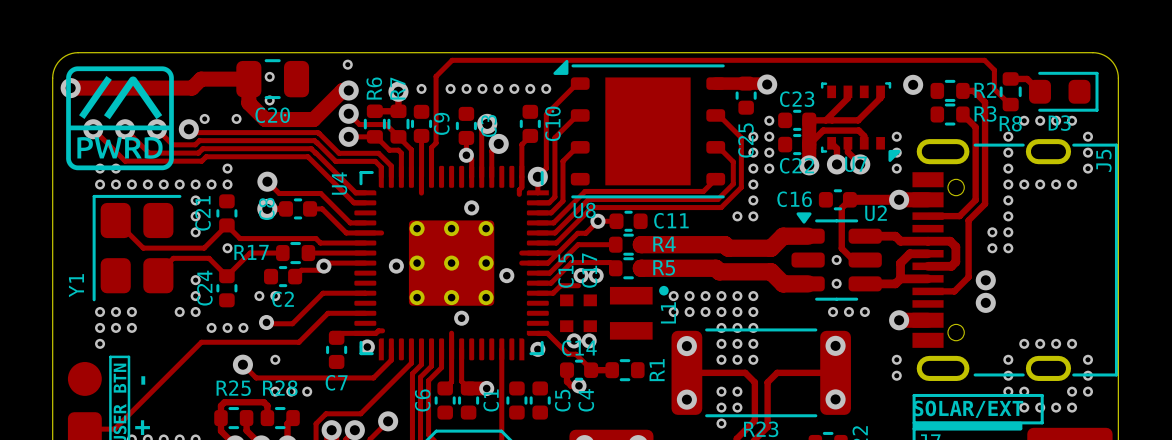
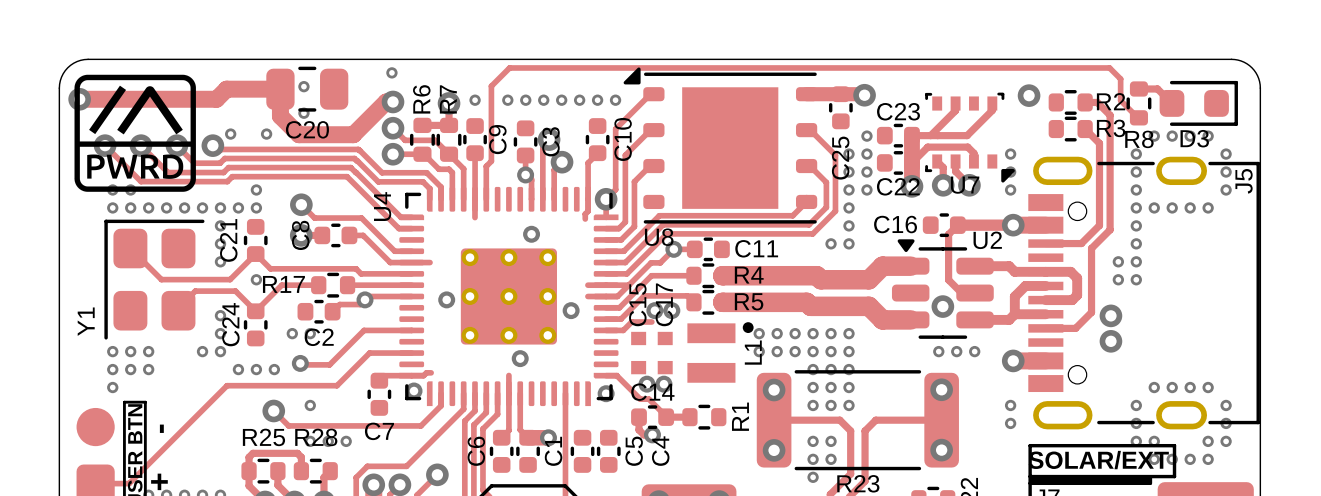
via: (836, 260) -> none
via: none -> (942, 306)
via: (836, 283) -> none

